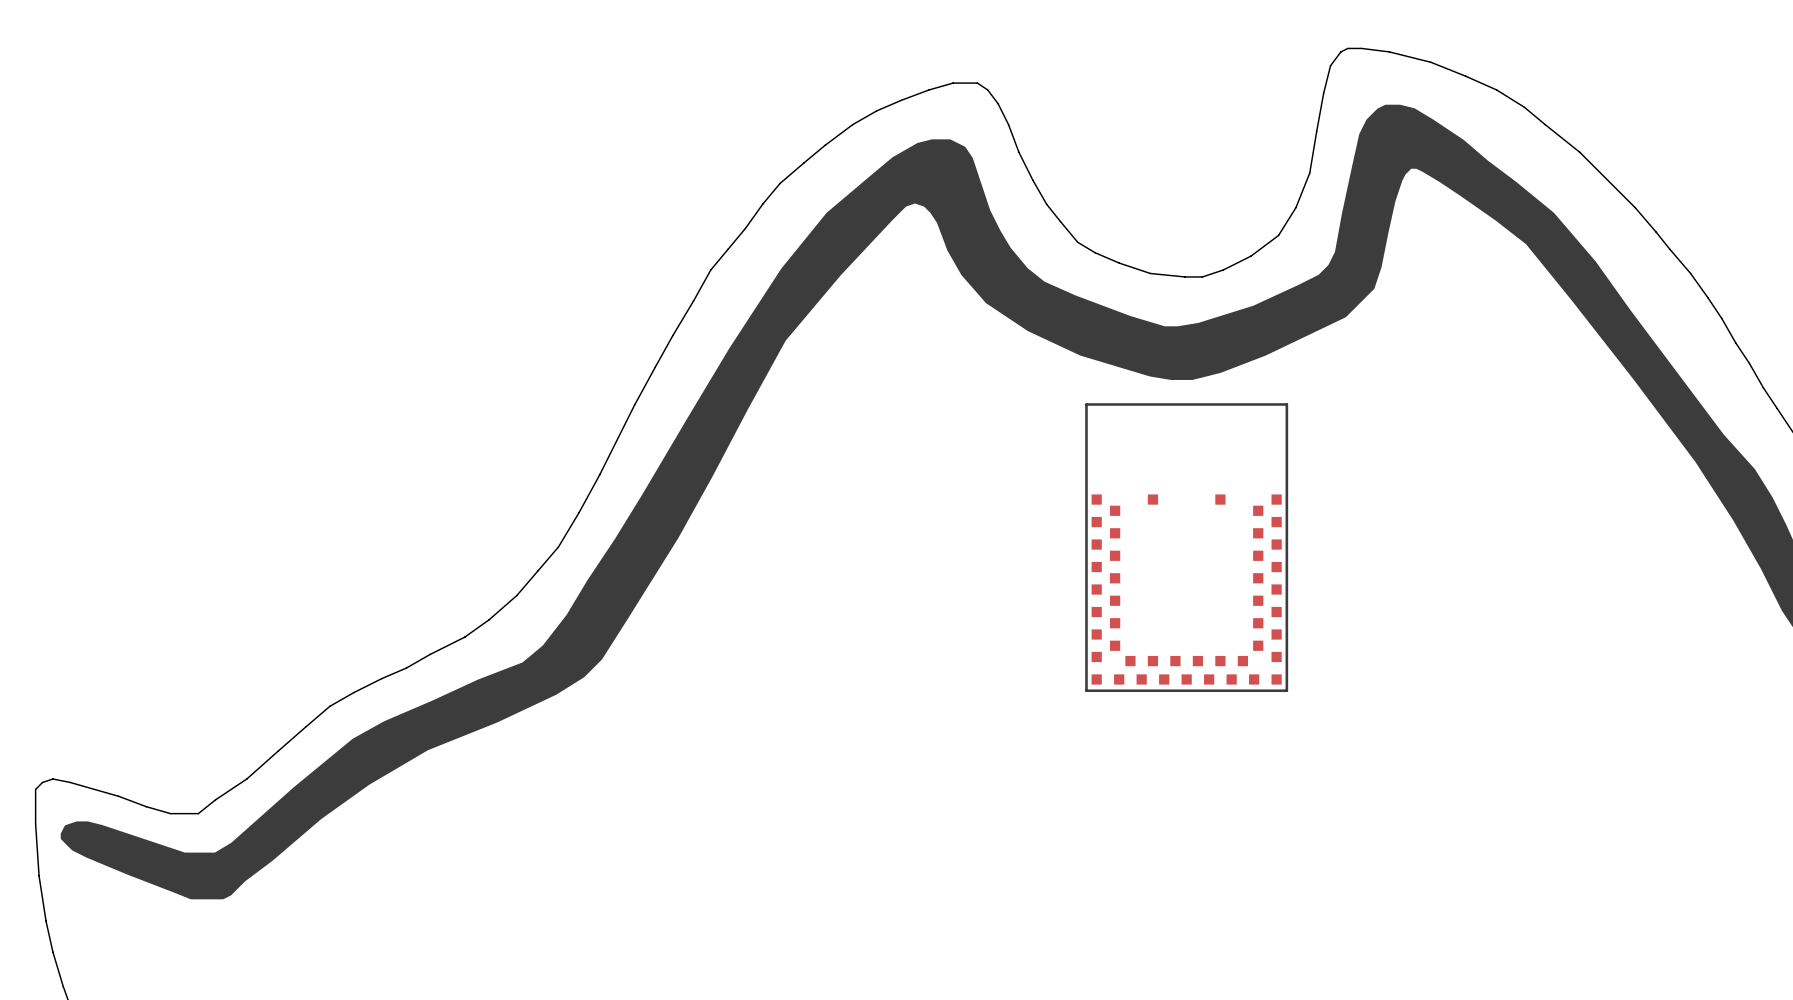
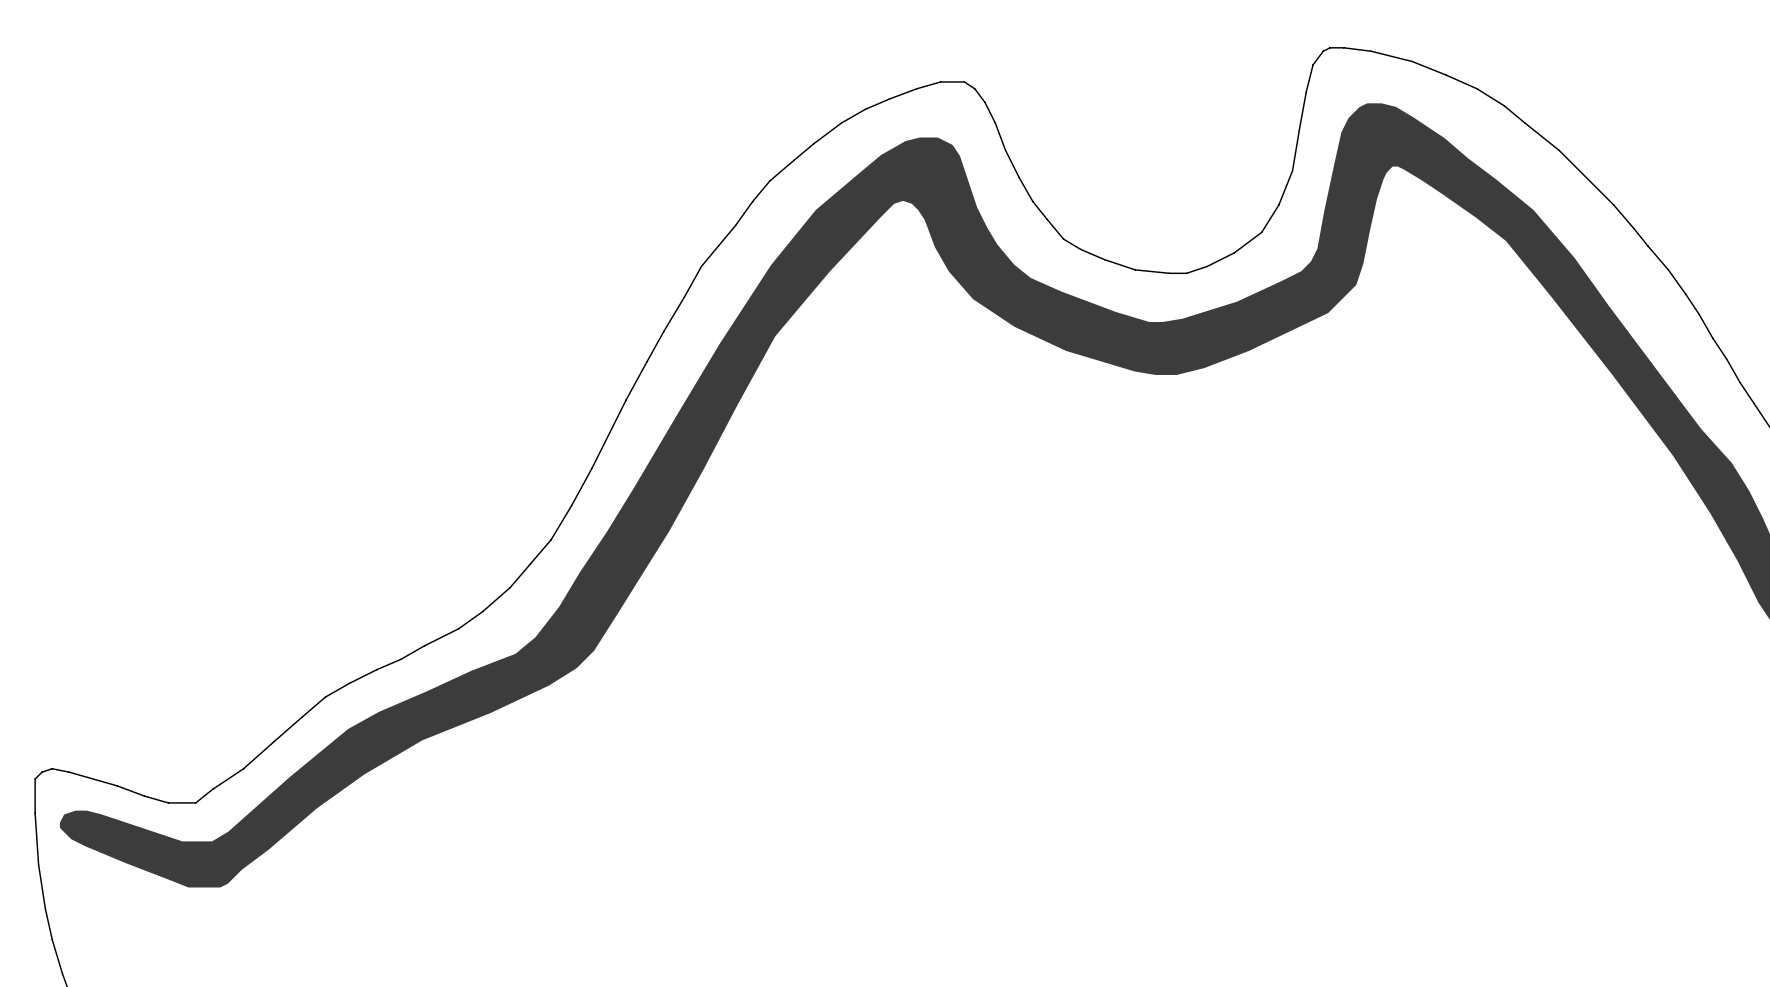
part: (1186, 547) -> none

